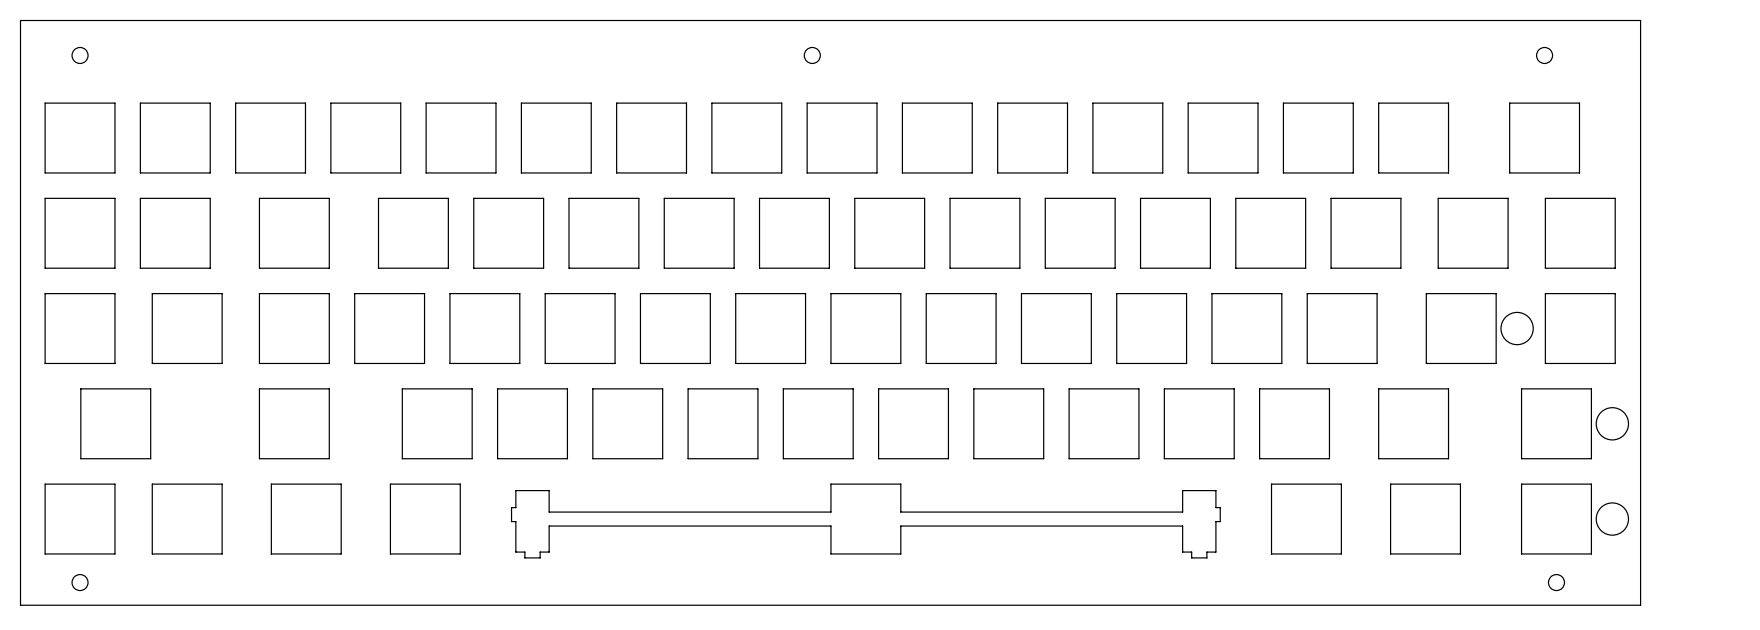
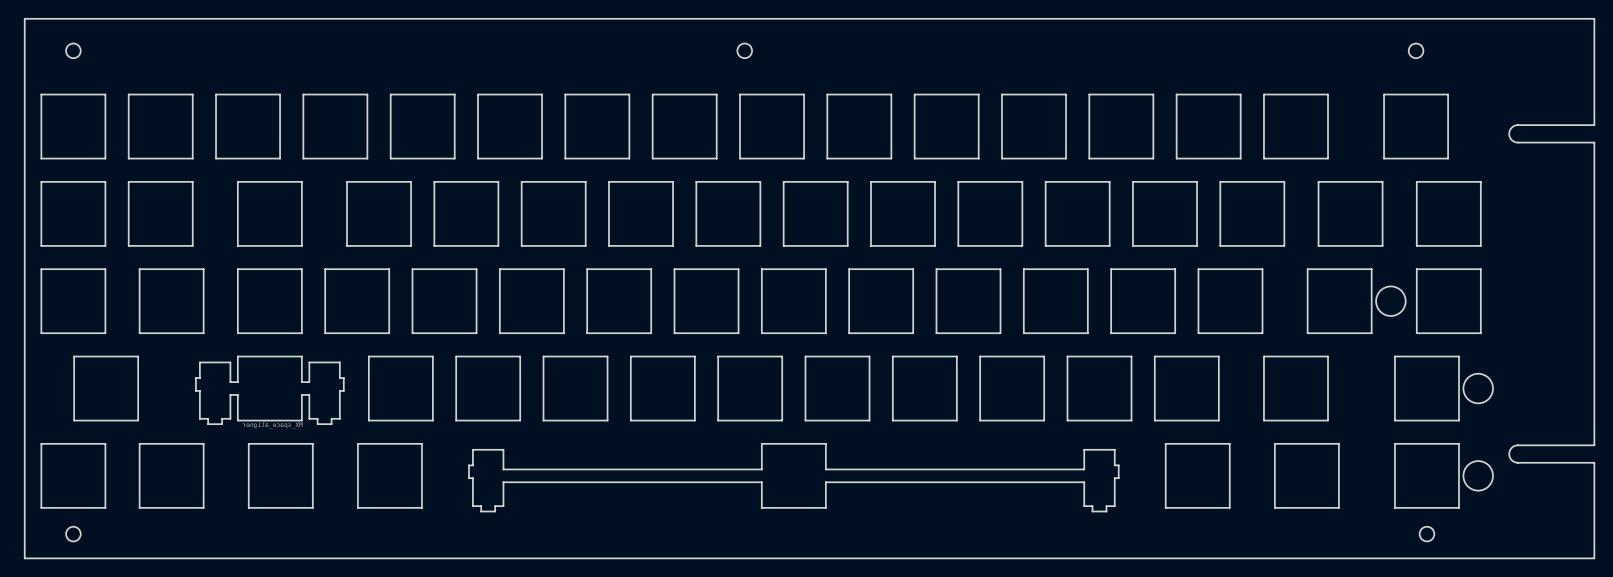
board edge: (1640, 20) (1640, 605) (20, 605) (20, 20) (26, 20) -> (1504, 18) (1594, 18) (1594, 125) (1516, 125) (1511, 128) (1509, 133) (1511, 139) (1516, 142) (1594, 142) (1594, 445) (1516, 445) (1511, 448) (1509, 454) (1511, 459) (1516, 462) (1594, 462) (1594, 558) (24, 558) (24, 18)
drawing shape: [259, 388, 330, 460] -> [195, 356, 345, 429]

